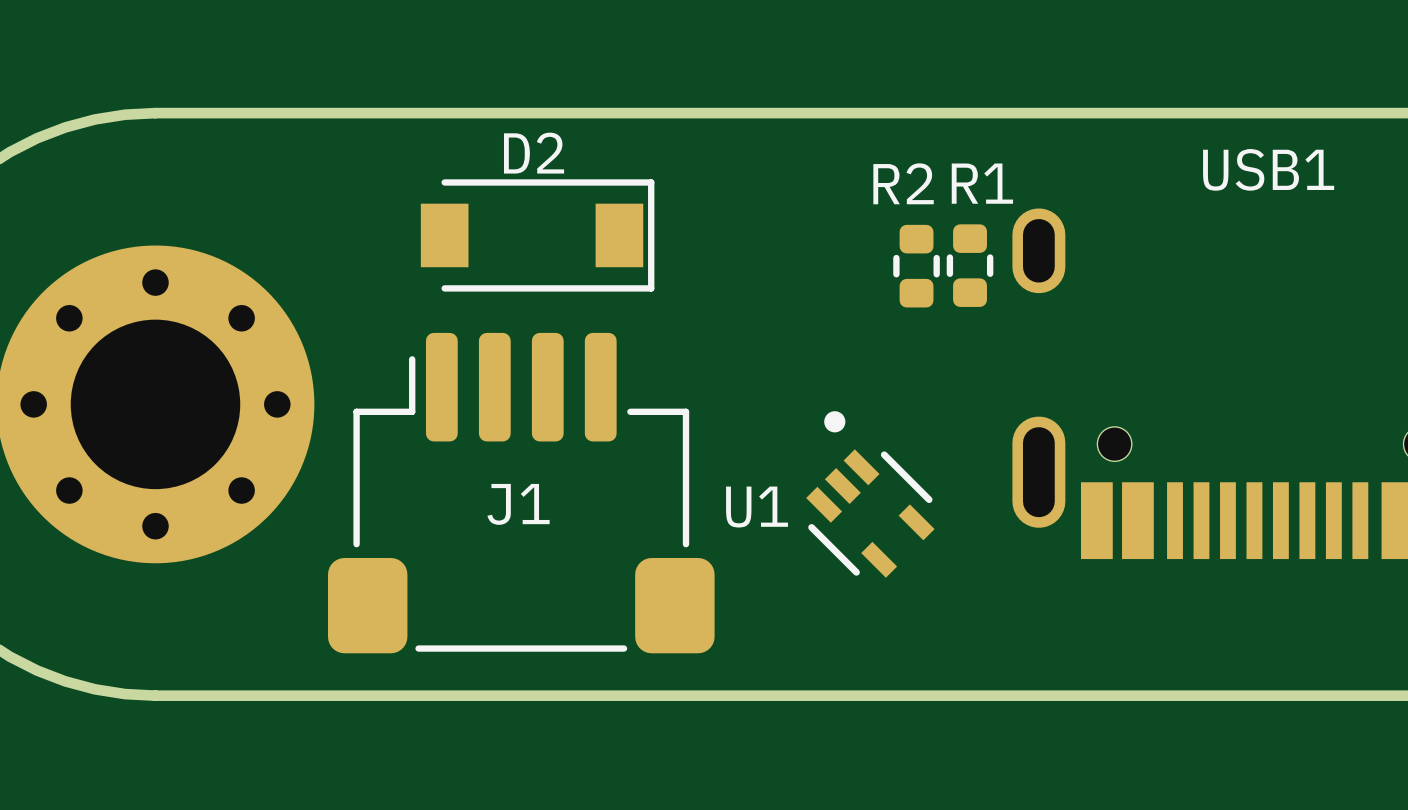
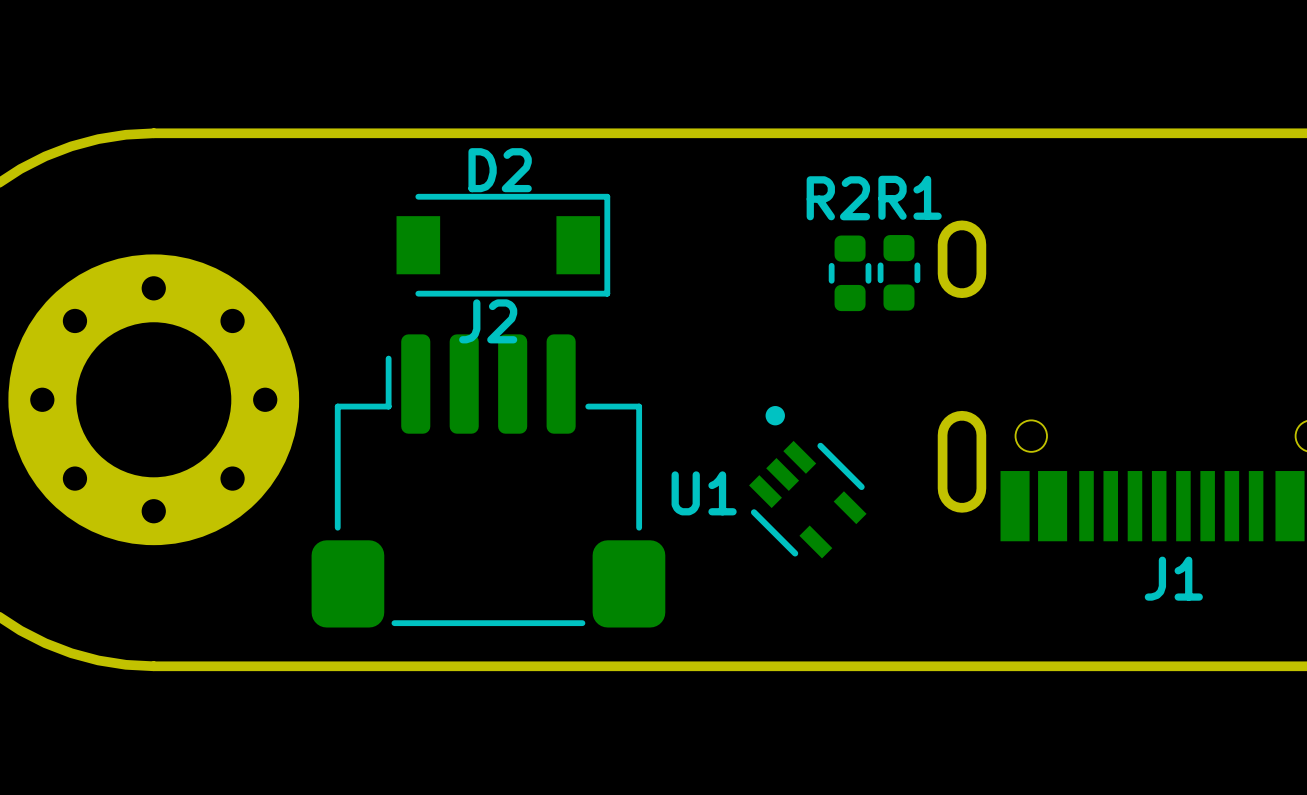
USB1 name: USB1 (1268, 169) -> J1 (1173, 578)
J1 name: J1 (518, 504) -> J2 (488, 321)

